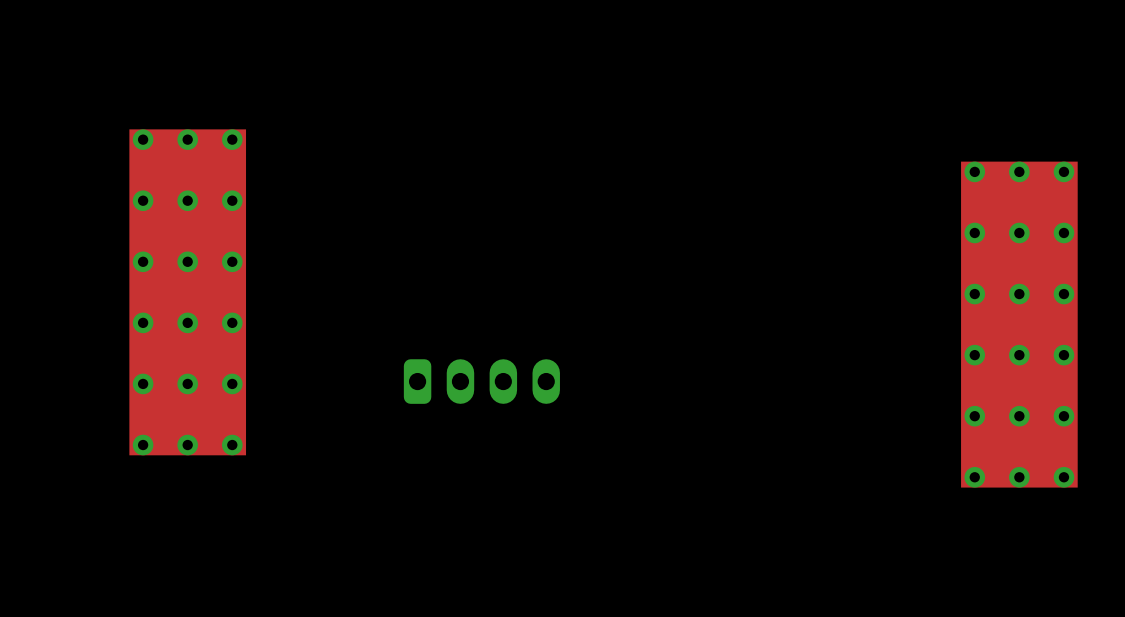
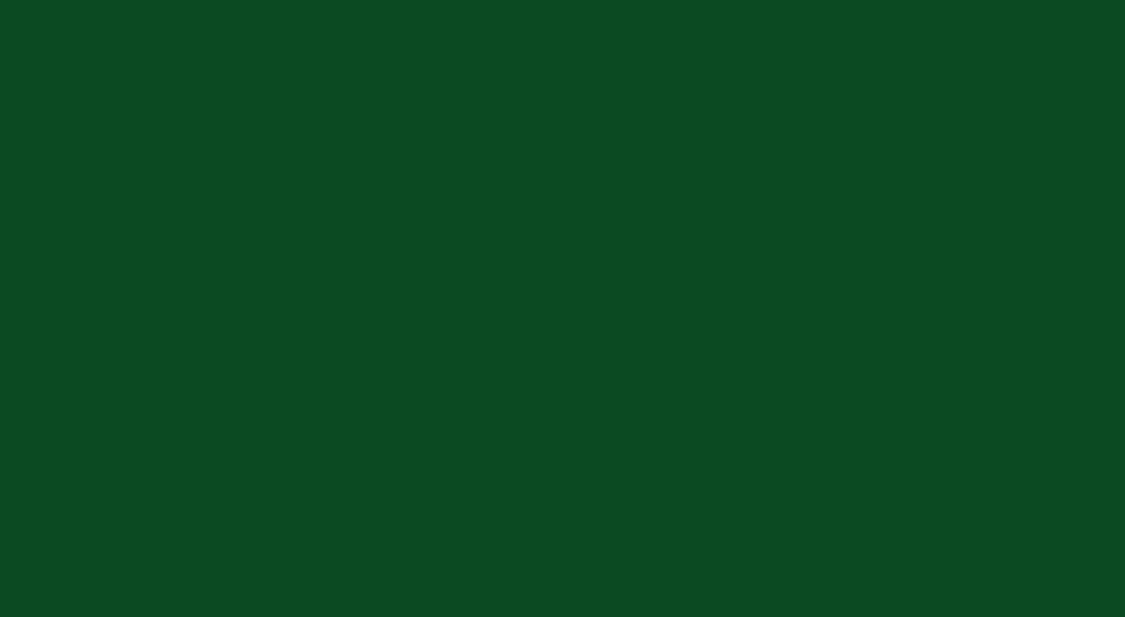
part: (187, 292) -> none
part: (1019, 324) -> none
part: (481, 381) -> none

